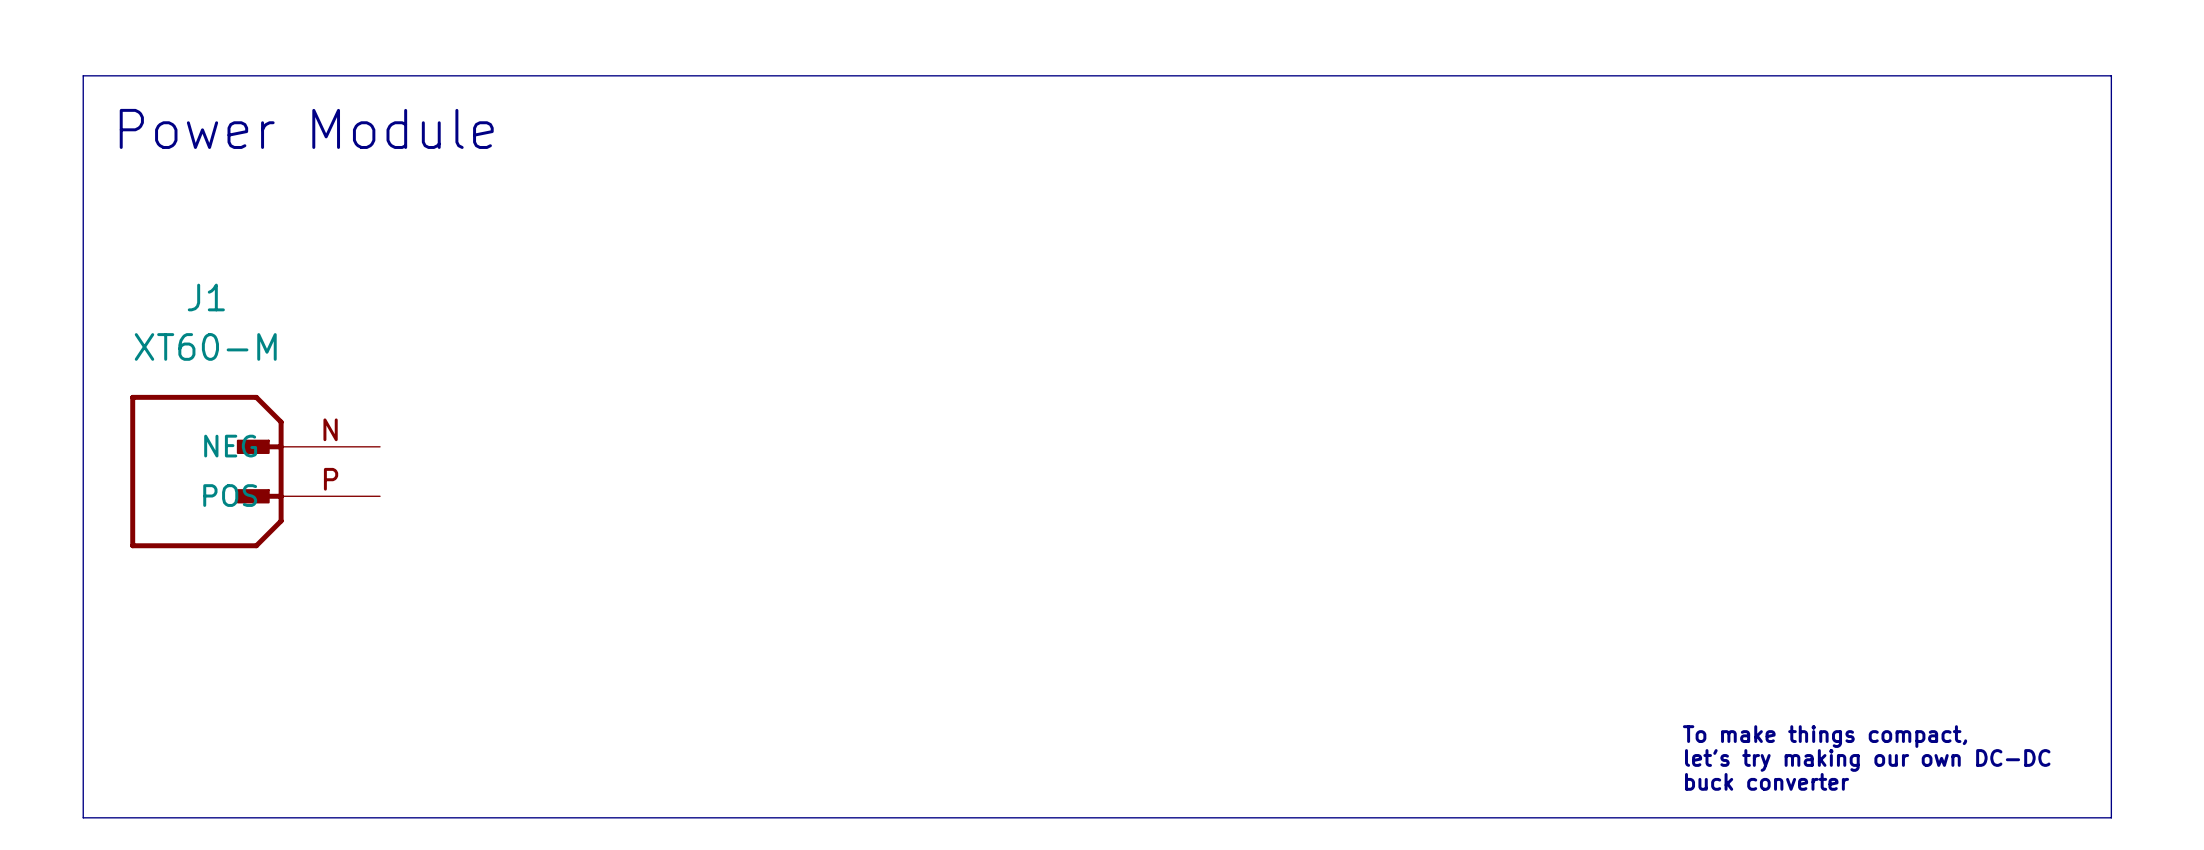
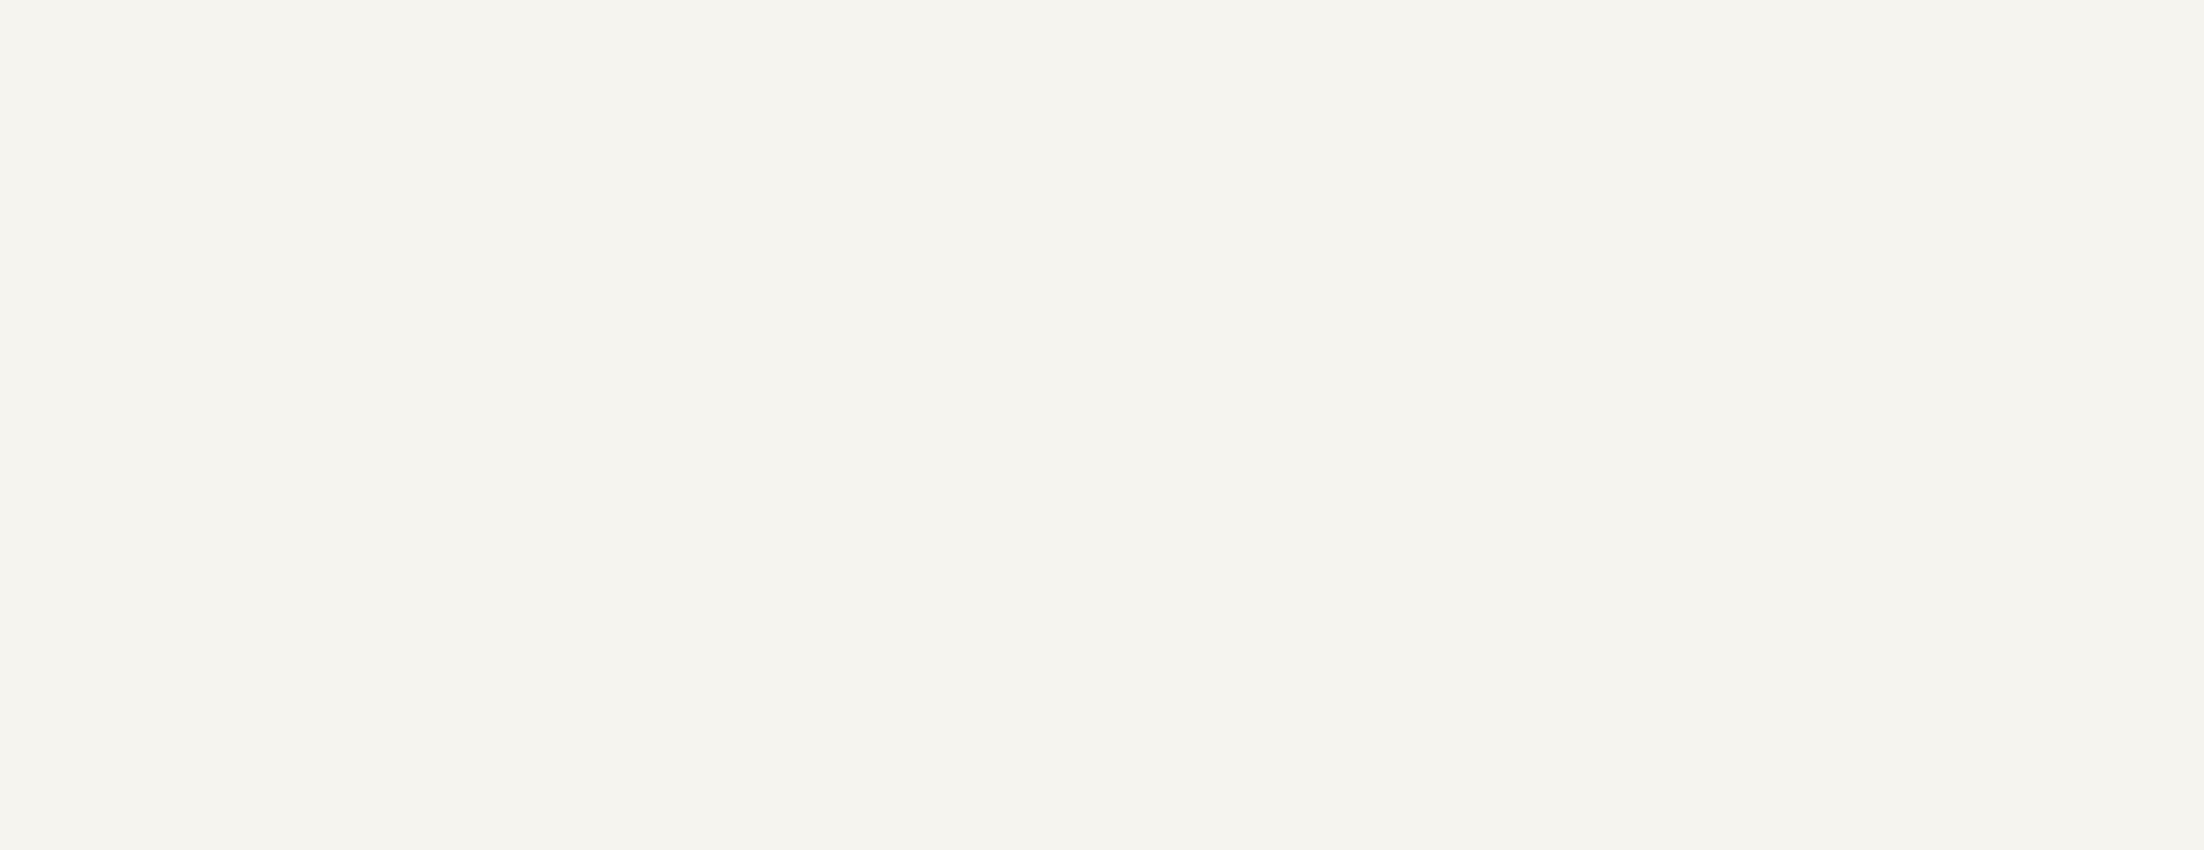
line: (83, 75) (2111, 75) (2111, 817) (83, 817) (83, 75) -> none
text: Power Module (306, 128) -> none
J1: XT60-M (255, 471) -> none
text: To make things compact, (1824, 736) -> none
text: let's try making our own DC-DC (1867, 760) -> none
text: buck converter (1767, 781) -> none

